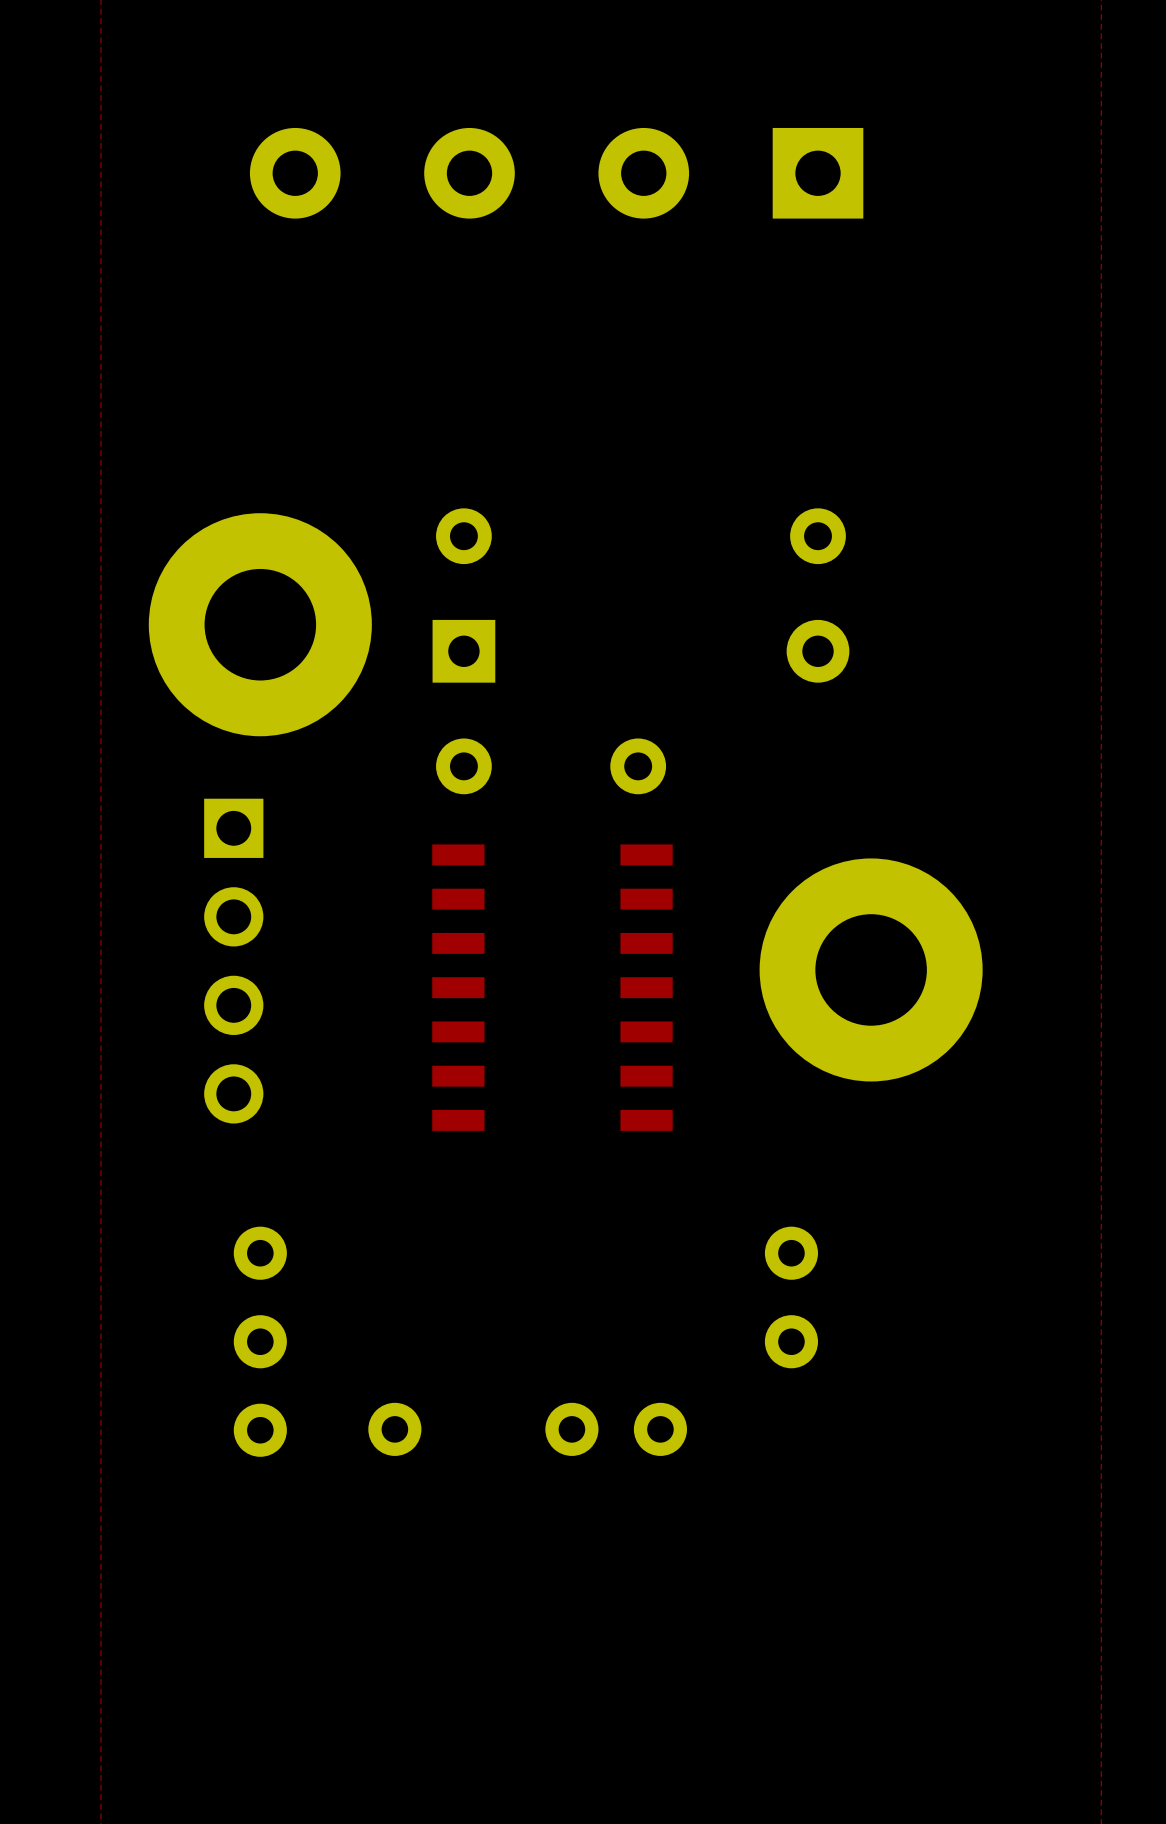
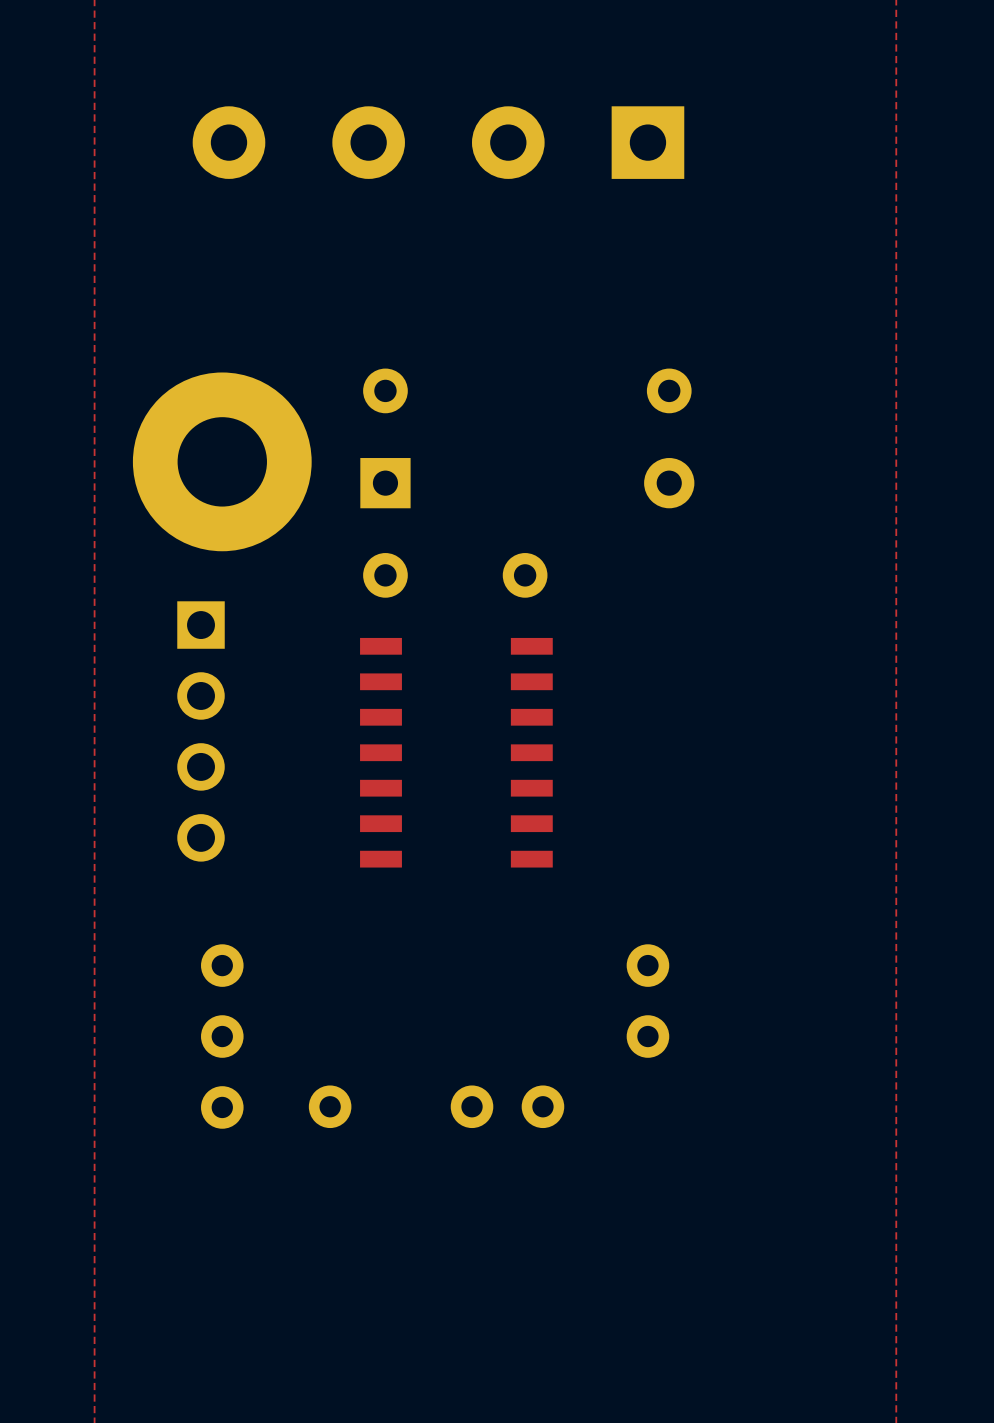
part position: (556, 173) -> (438, 142)
part: (871, 969) -> none

